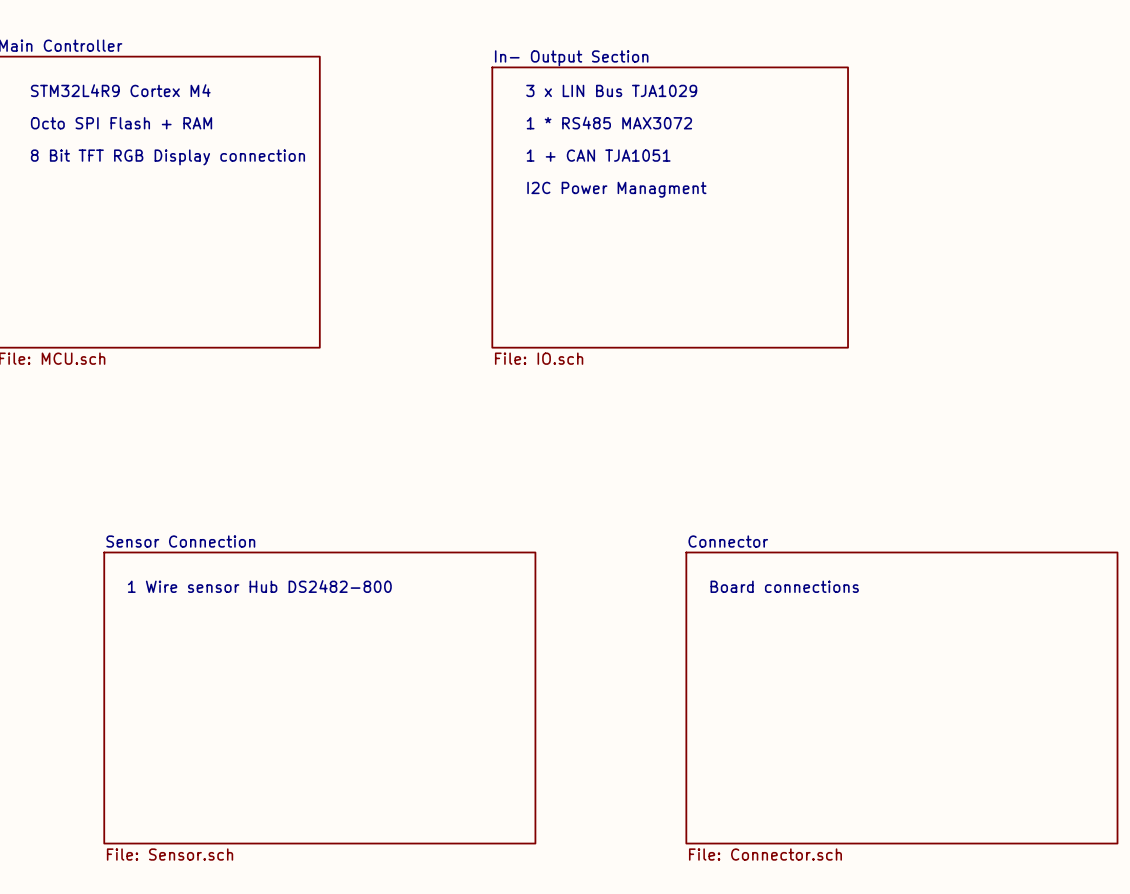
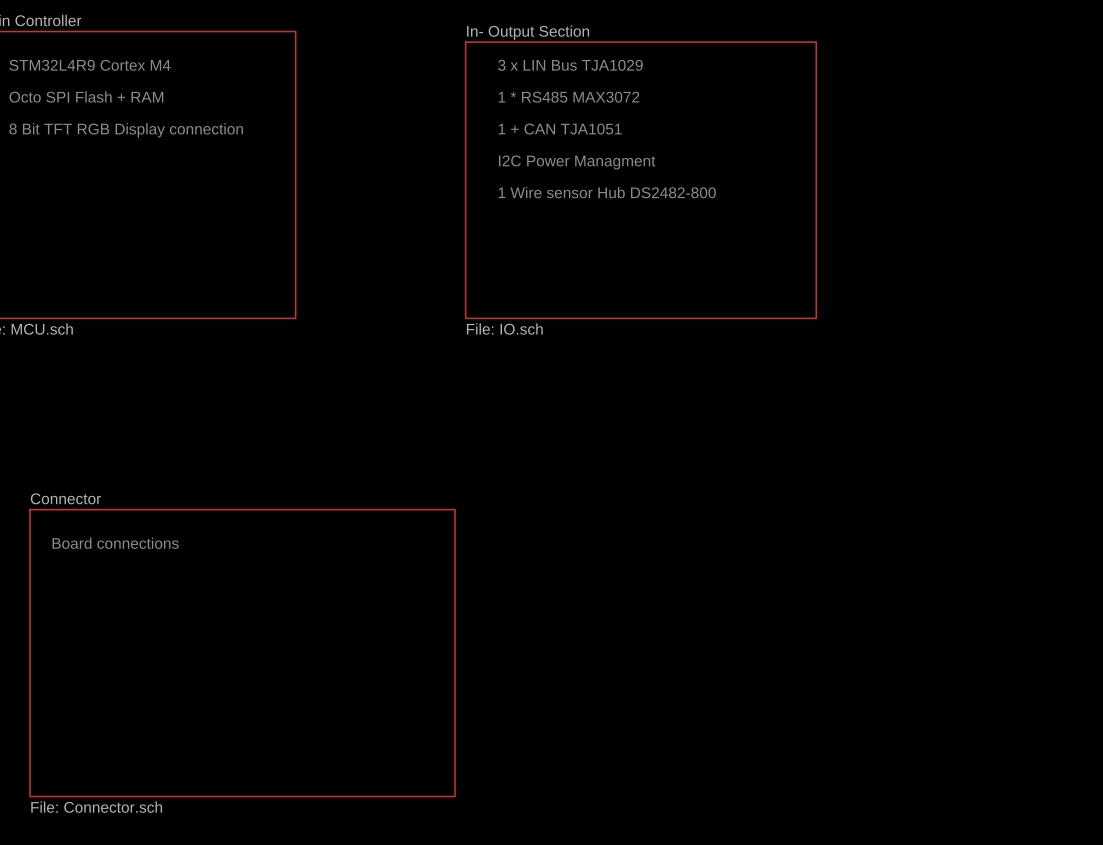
text: none -> 1 Wire sensor Hub DS2482-800 (607, 192)
text: none -> Board connections (115, 543)
text: 1 Wire sensor Hub DS2482-800 (259, 586) -> none
text: Board connections (784, 586) -> none
sheet Connector: none -> File: Connector.sch (242, 653)
sheet Sensor Connection: File: Sensor.sch (319, 698) -> none
sheet Connector: File: Connector.sch (901, 698) -> none

